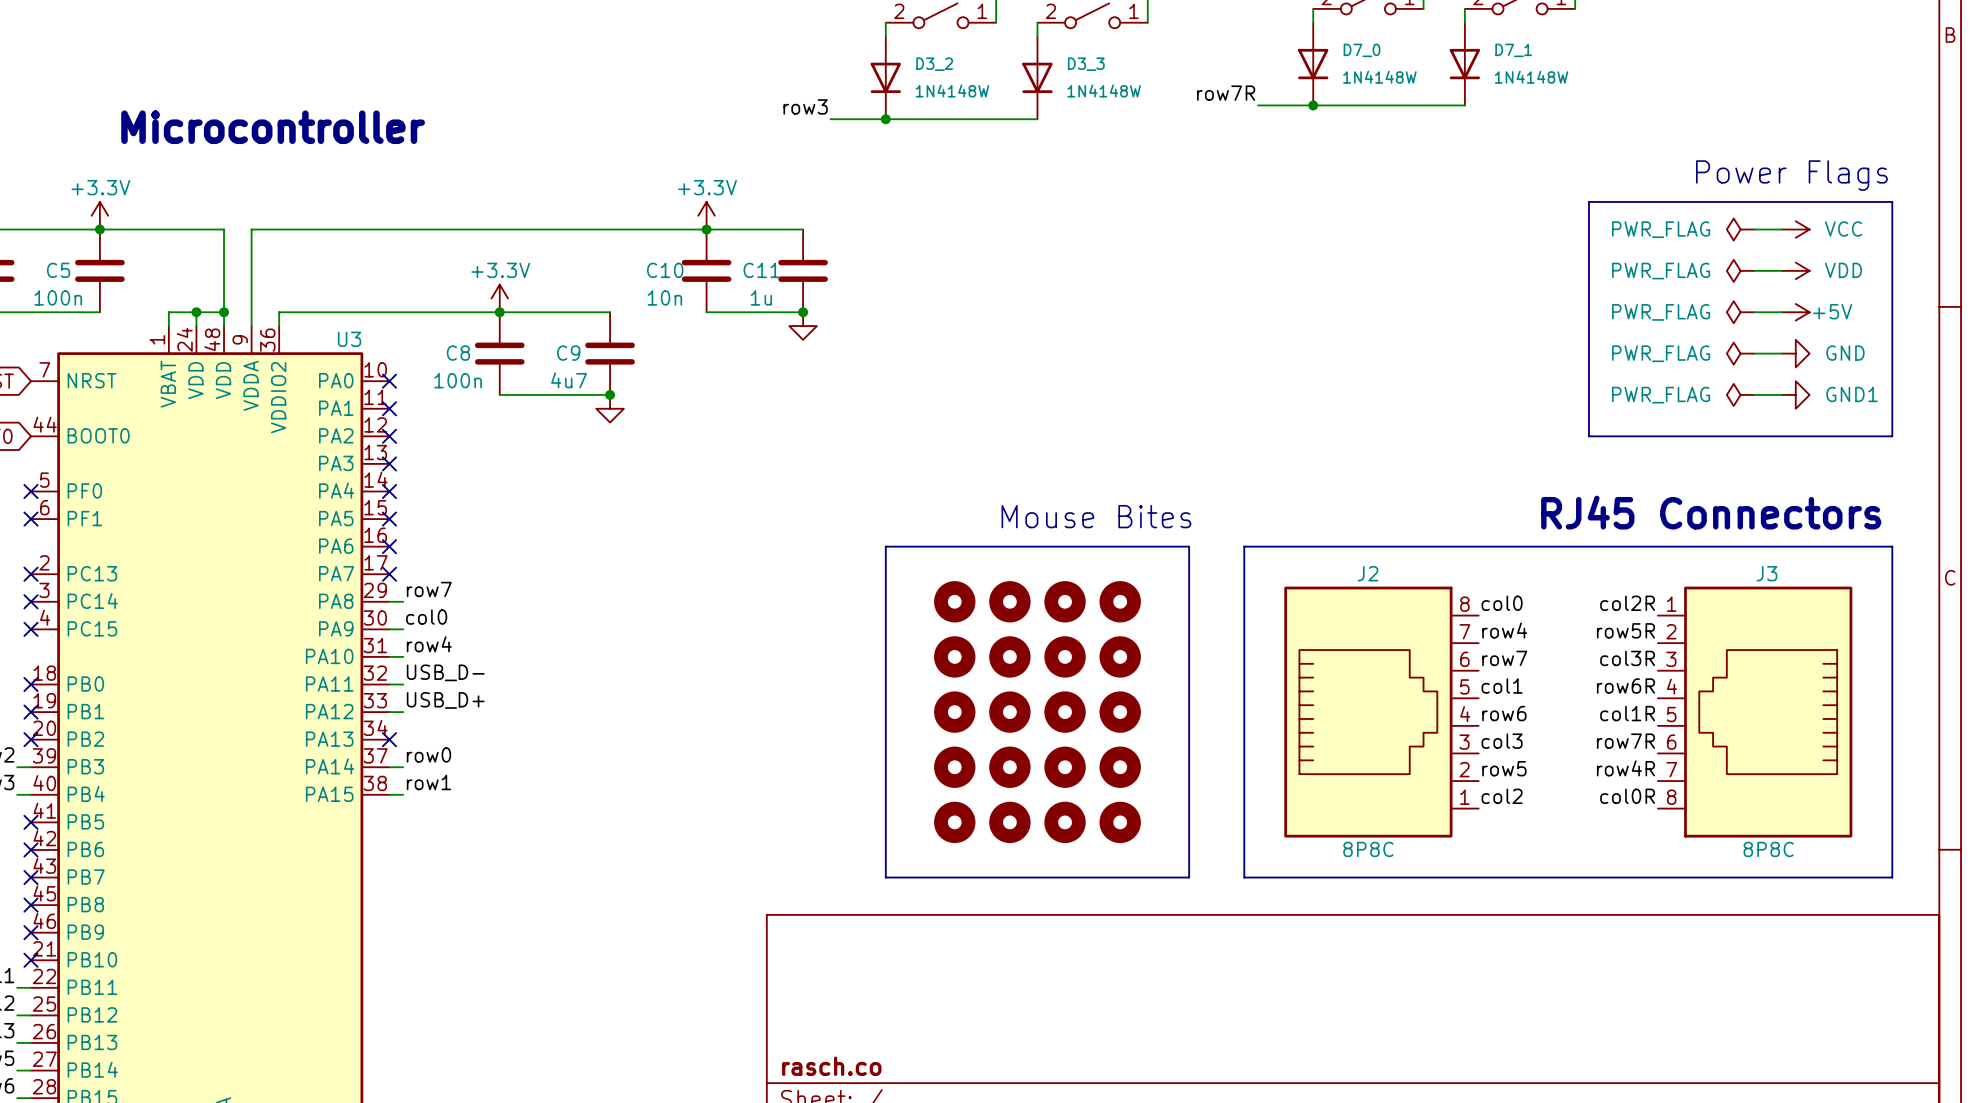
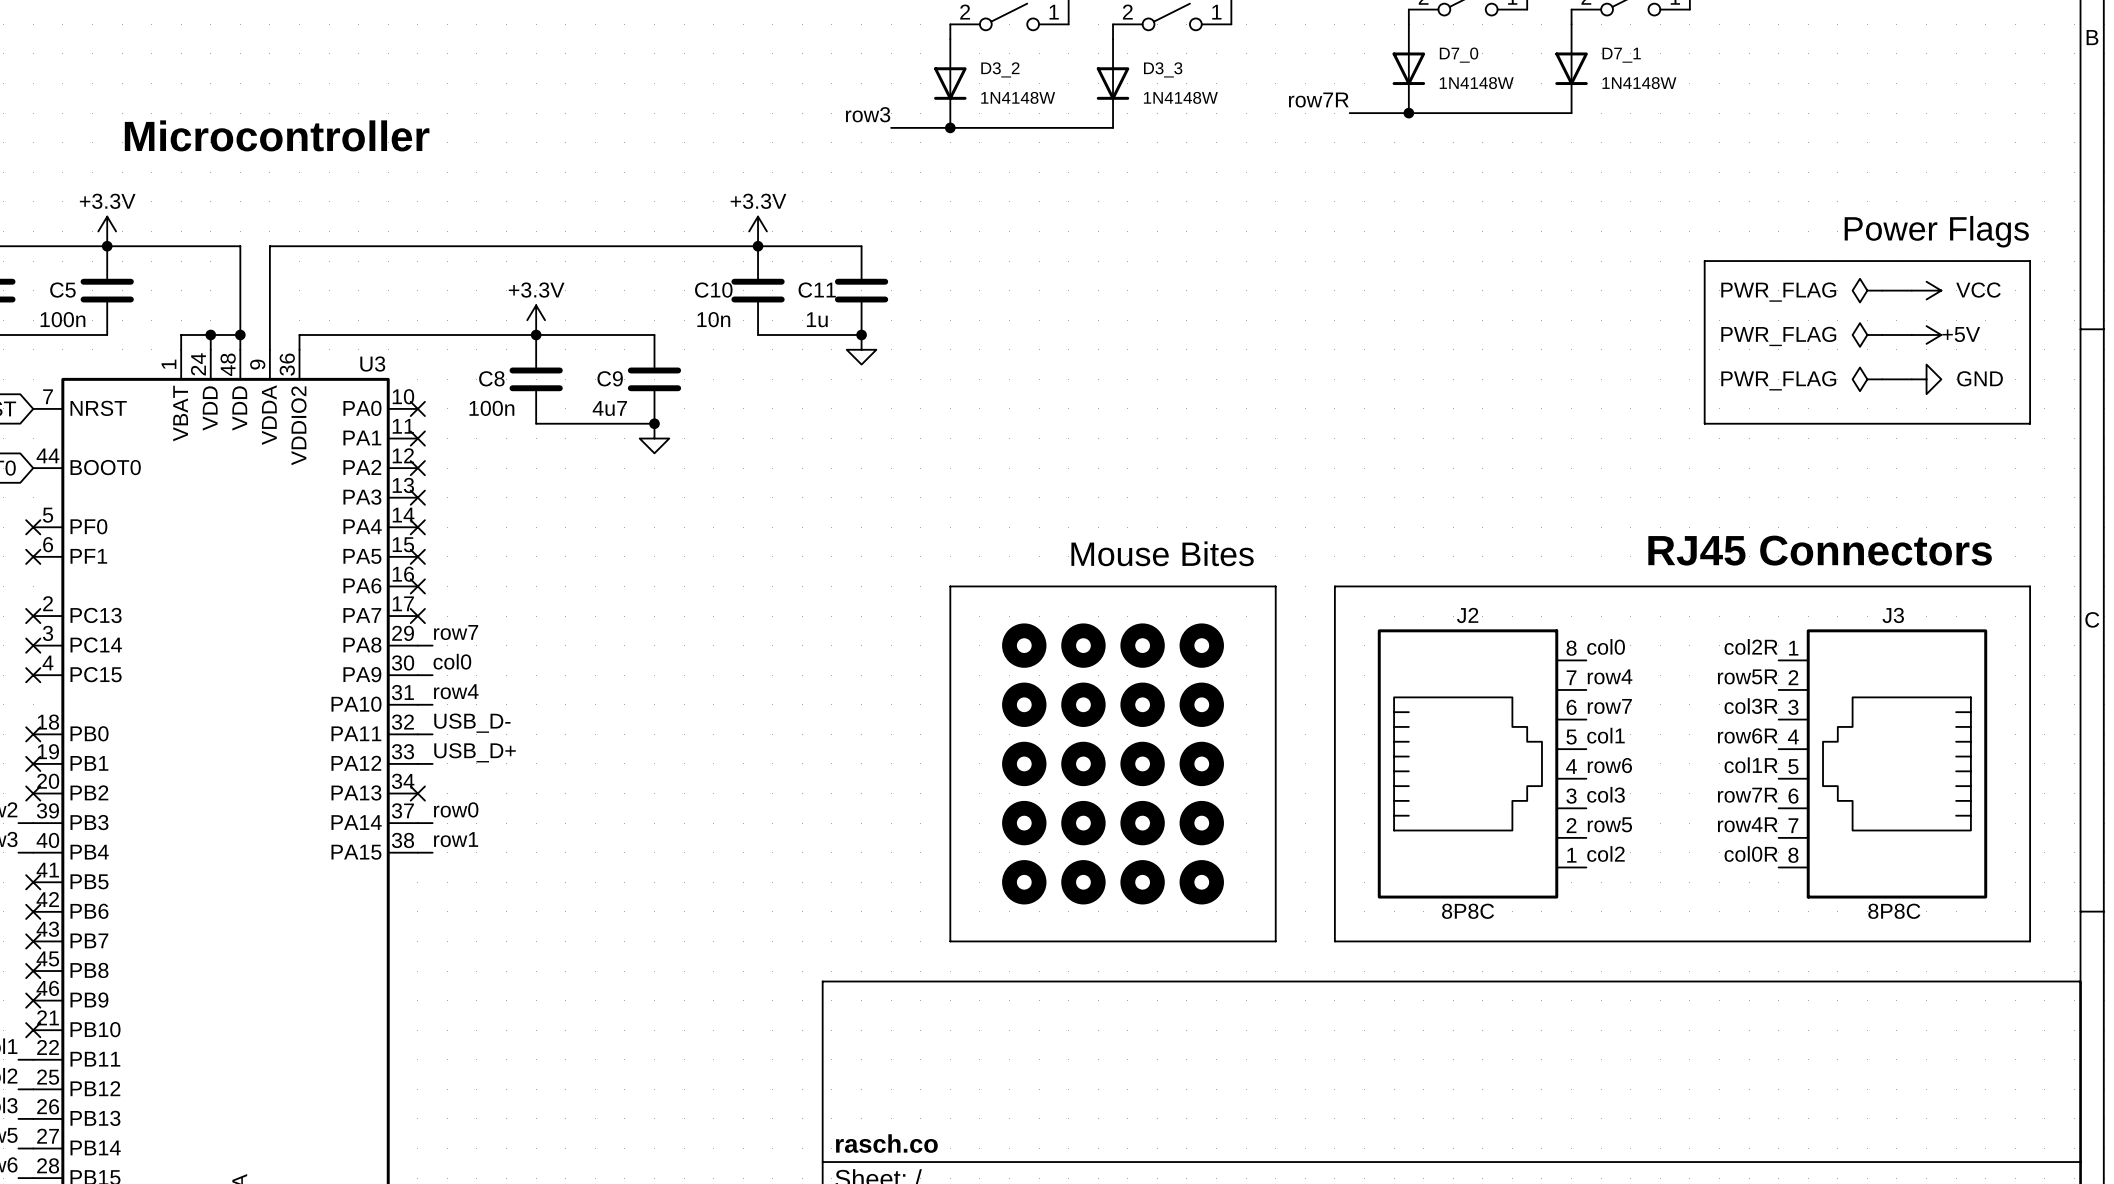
text position: Power Flags (1791, 175) -> Power Flags (1936, 231)
power symbol: PWR_FLAG (1740, 229) -> none
wire: (1754, 229) (1782, 229) -> none
power symbol: VCC (1795, 229) -> none
line: (1588, 243) (1588, 201) (1892, 201) (1892, 243) -> (1704, 261) (2030, 261)
power symbol: VDD (1795, 270) -> VCC (1926, 290)
line: (1588, 394) (1588, 436) (1892, 436) (1892, 394) -> (1704, 423) (2030, 423)
power symbol: PWR_FLAG (1740, 394) -> none
power symbol: GND1 (1795, 394) -> none

